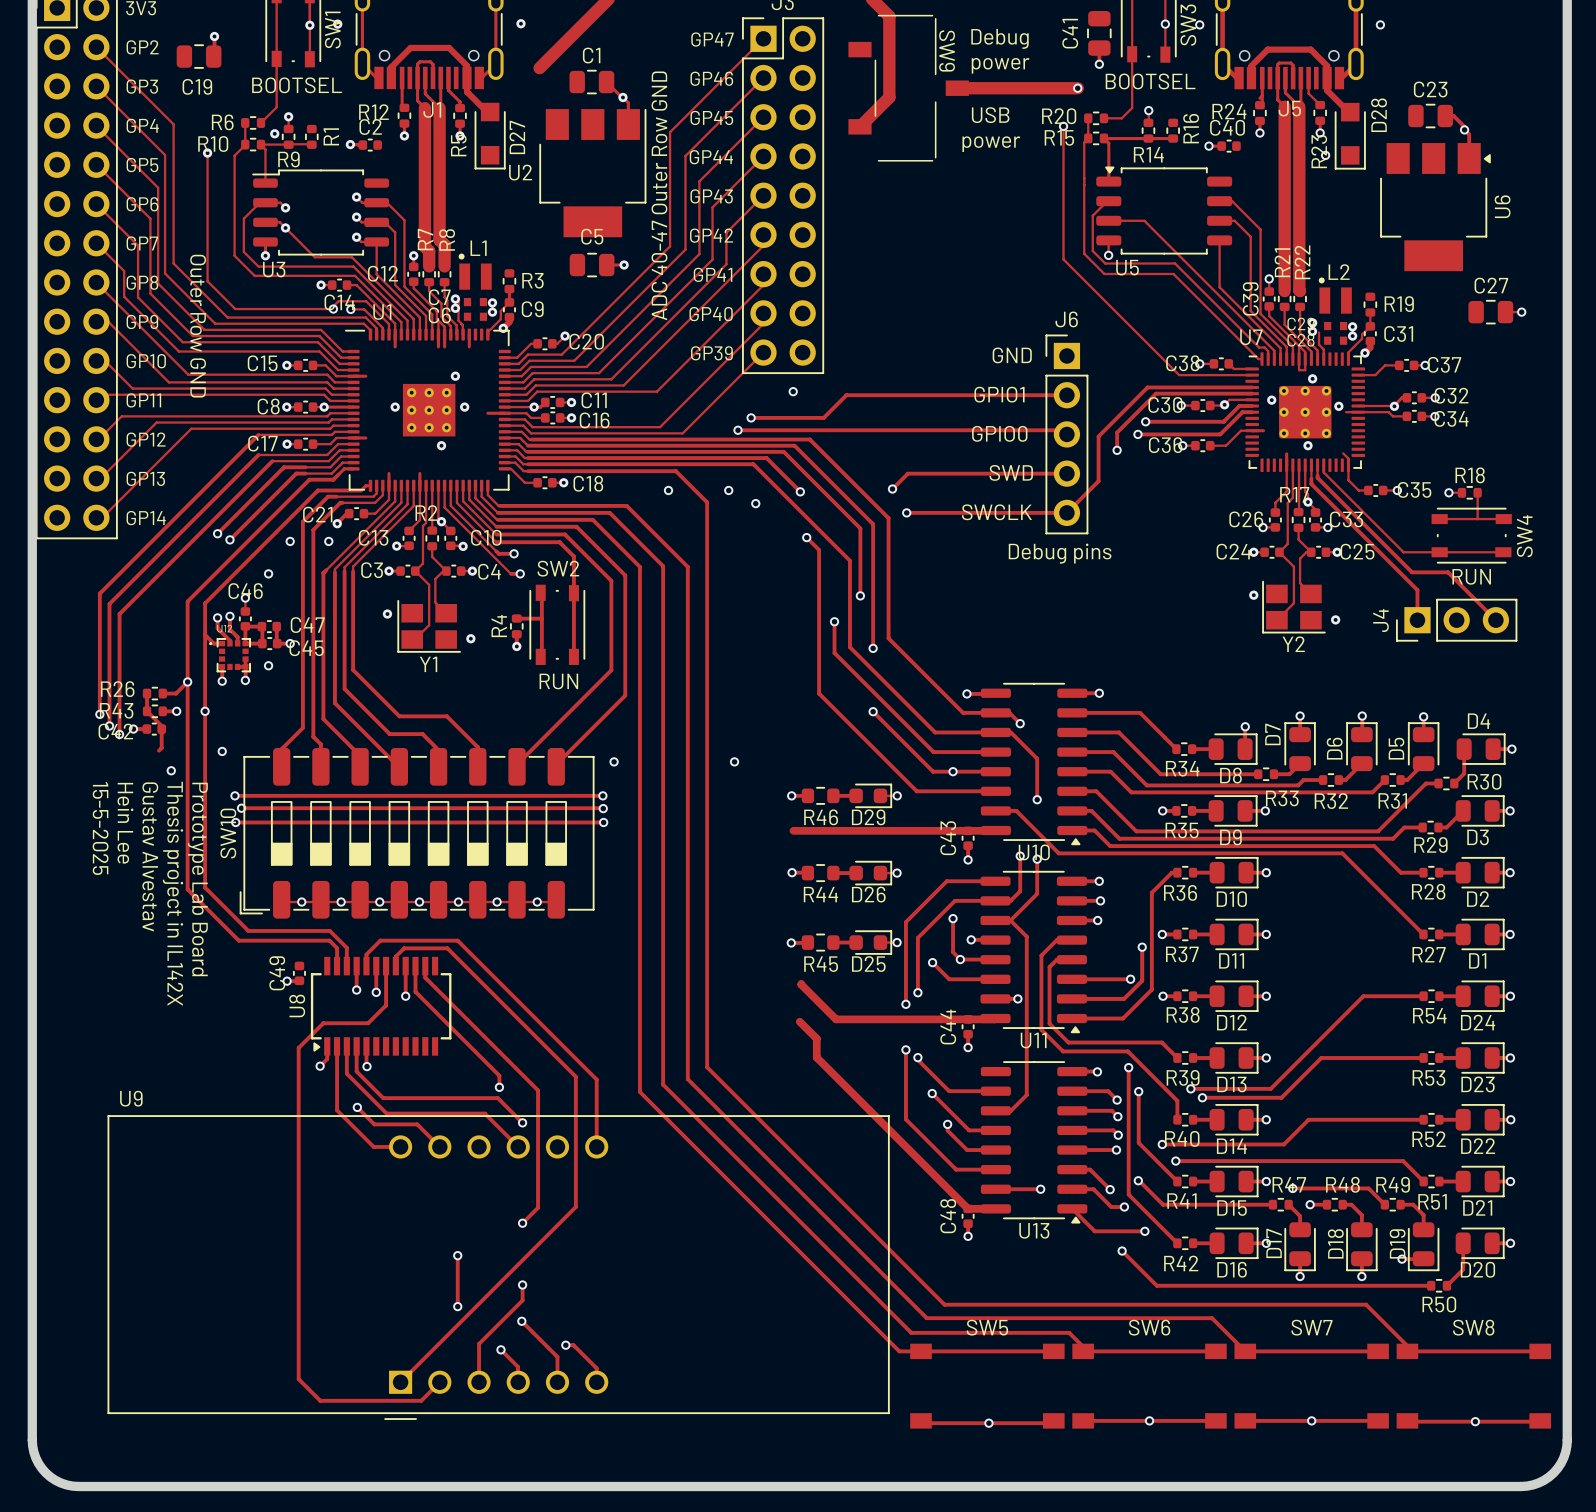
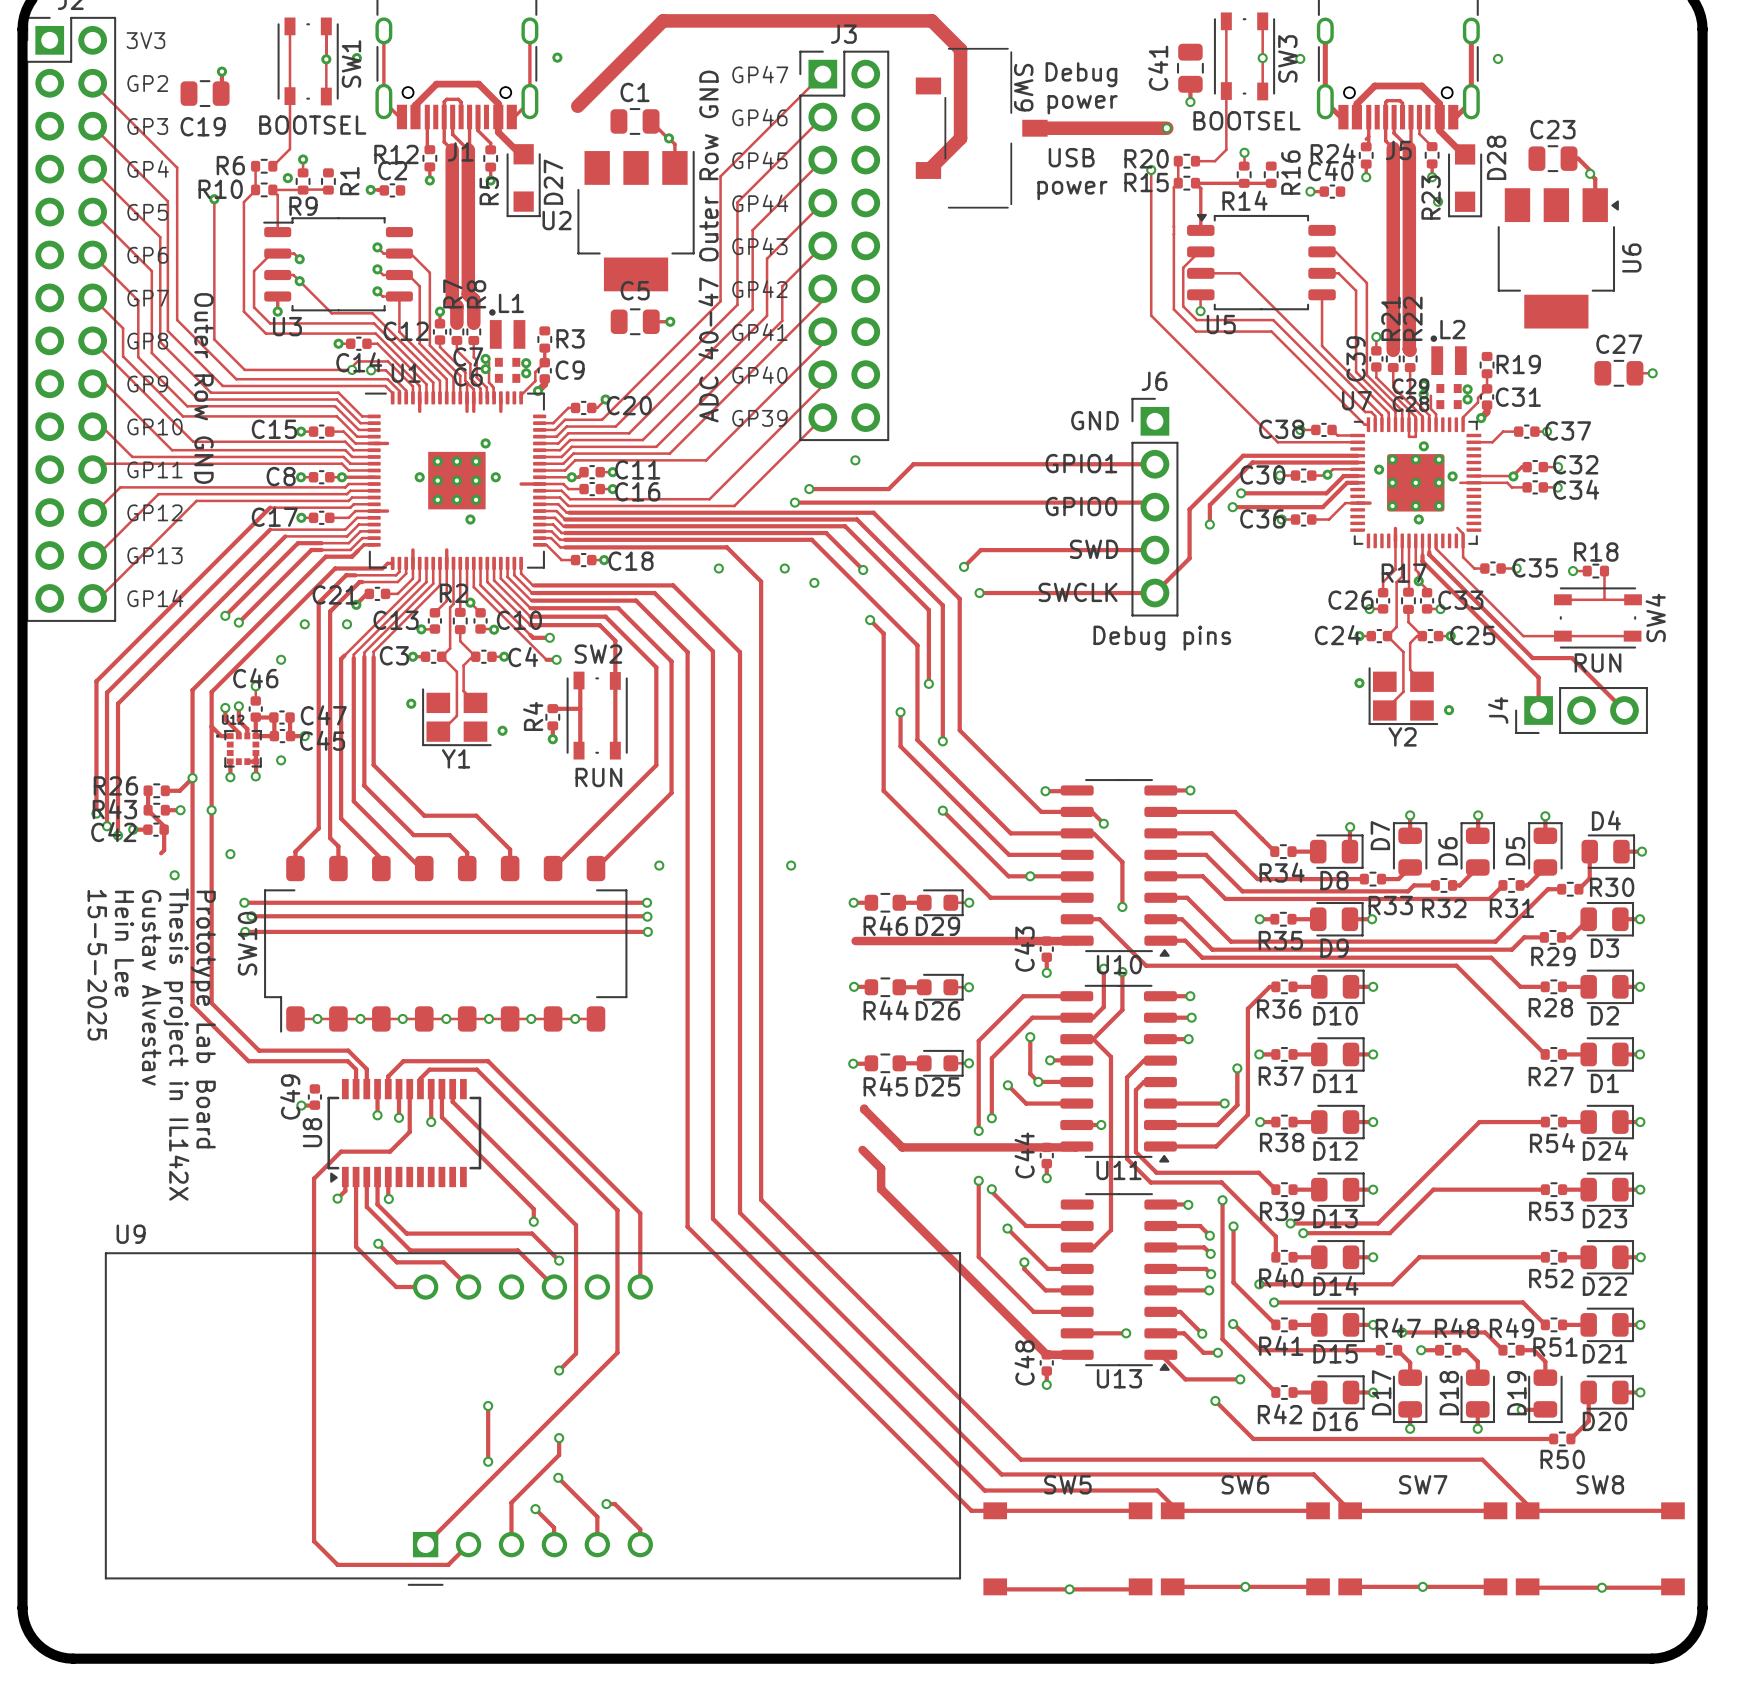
SW10 footprint: [239, 747, 595, 919] -> [264, 855, 628, 1033]

